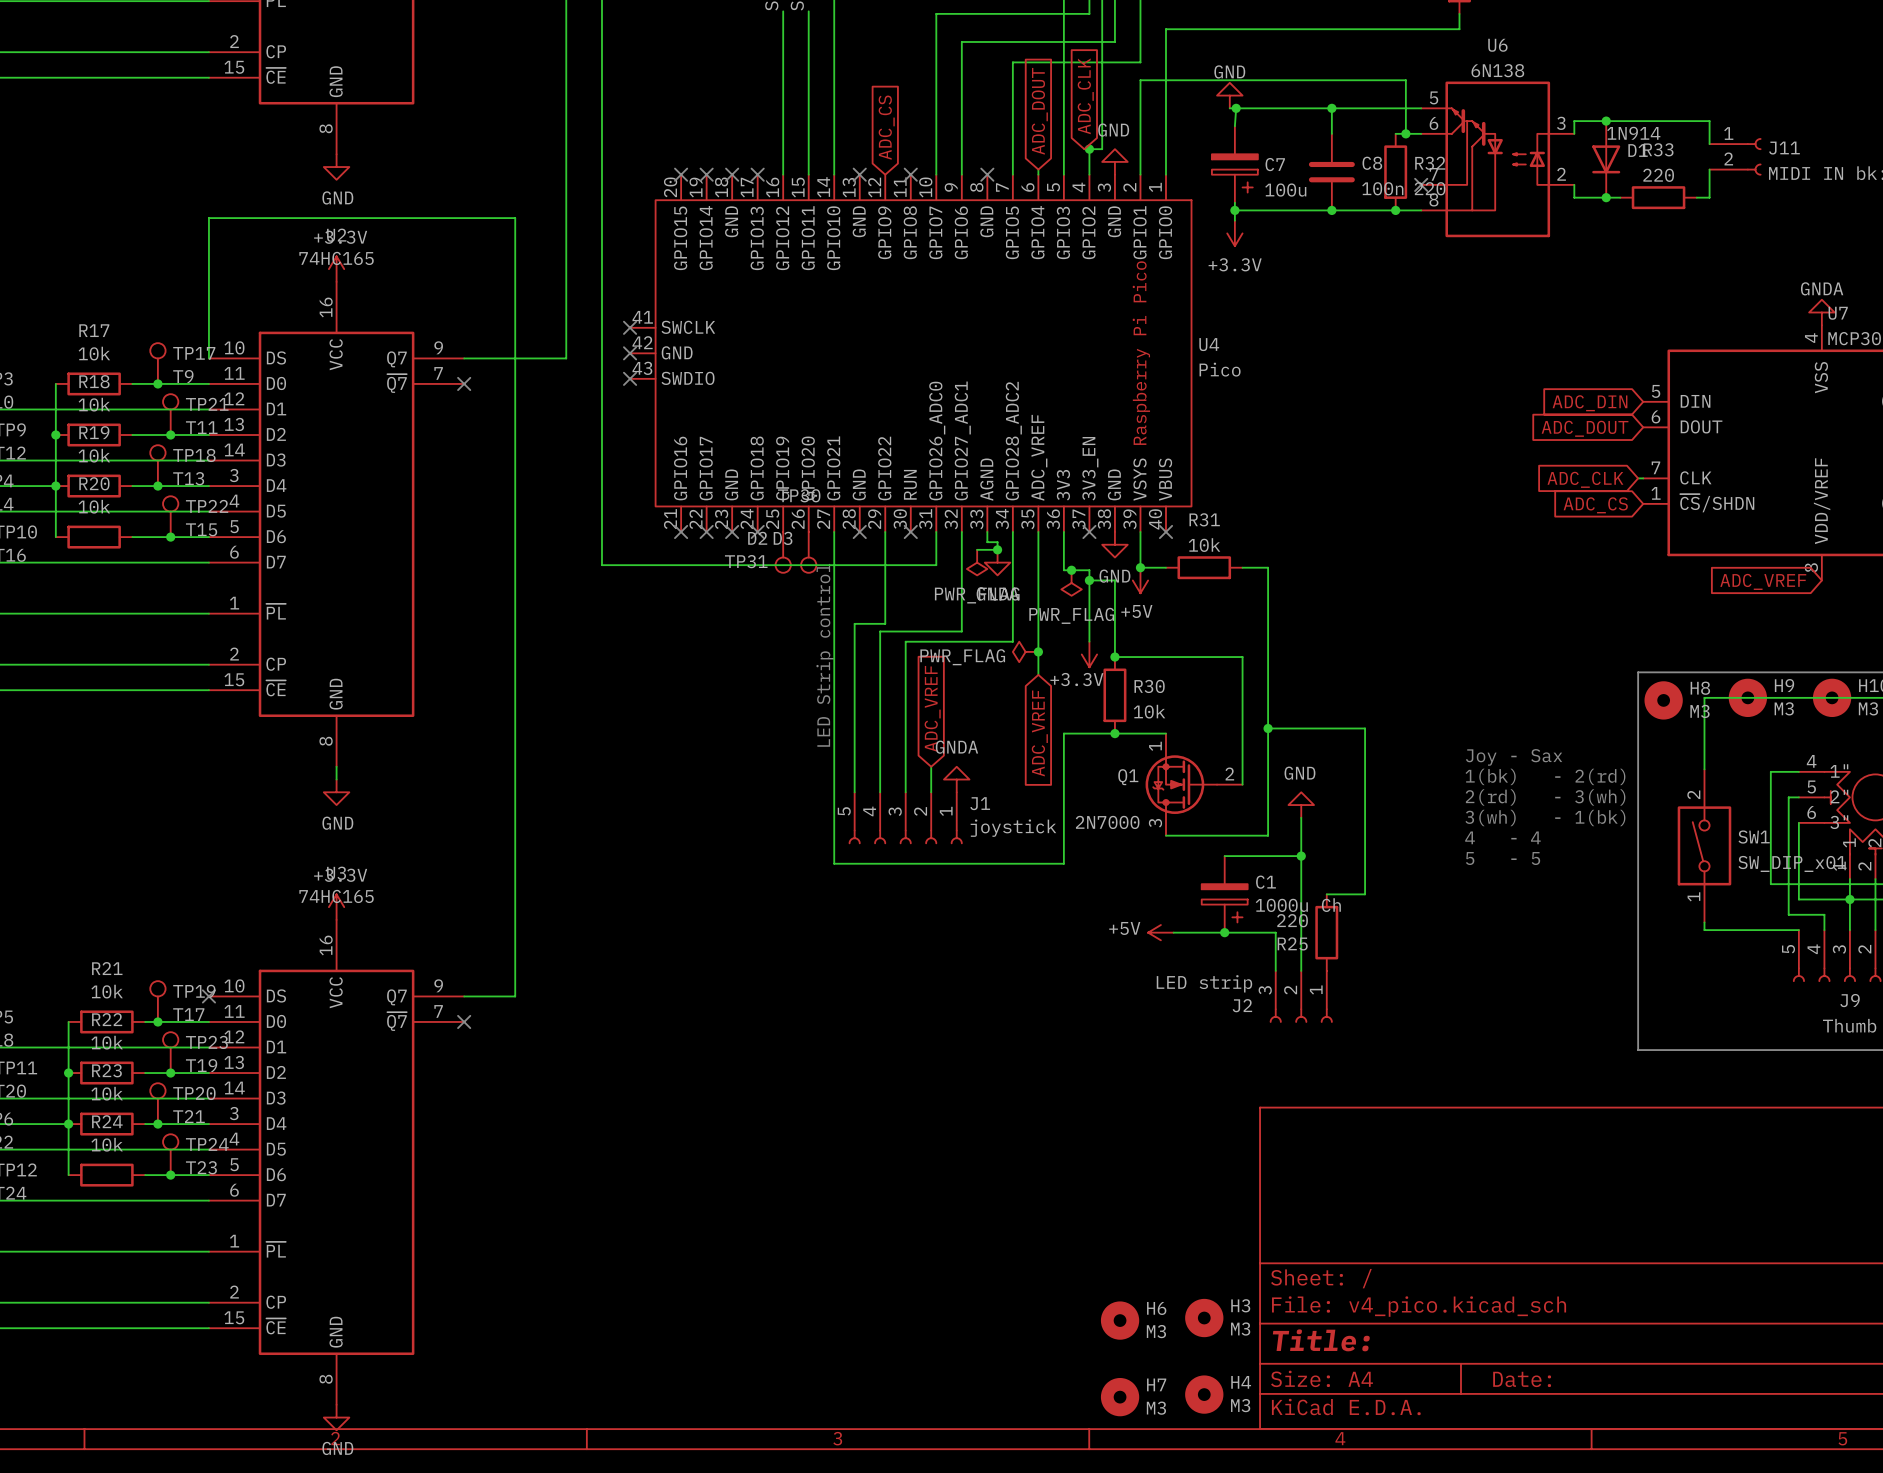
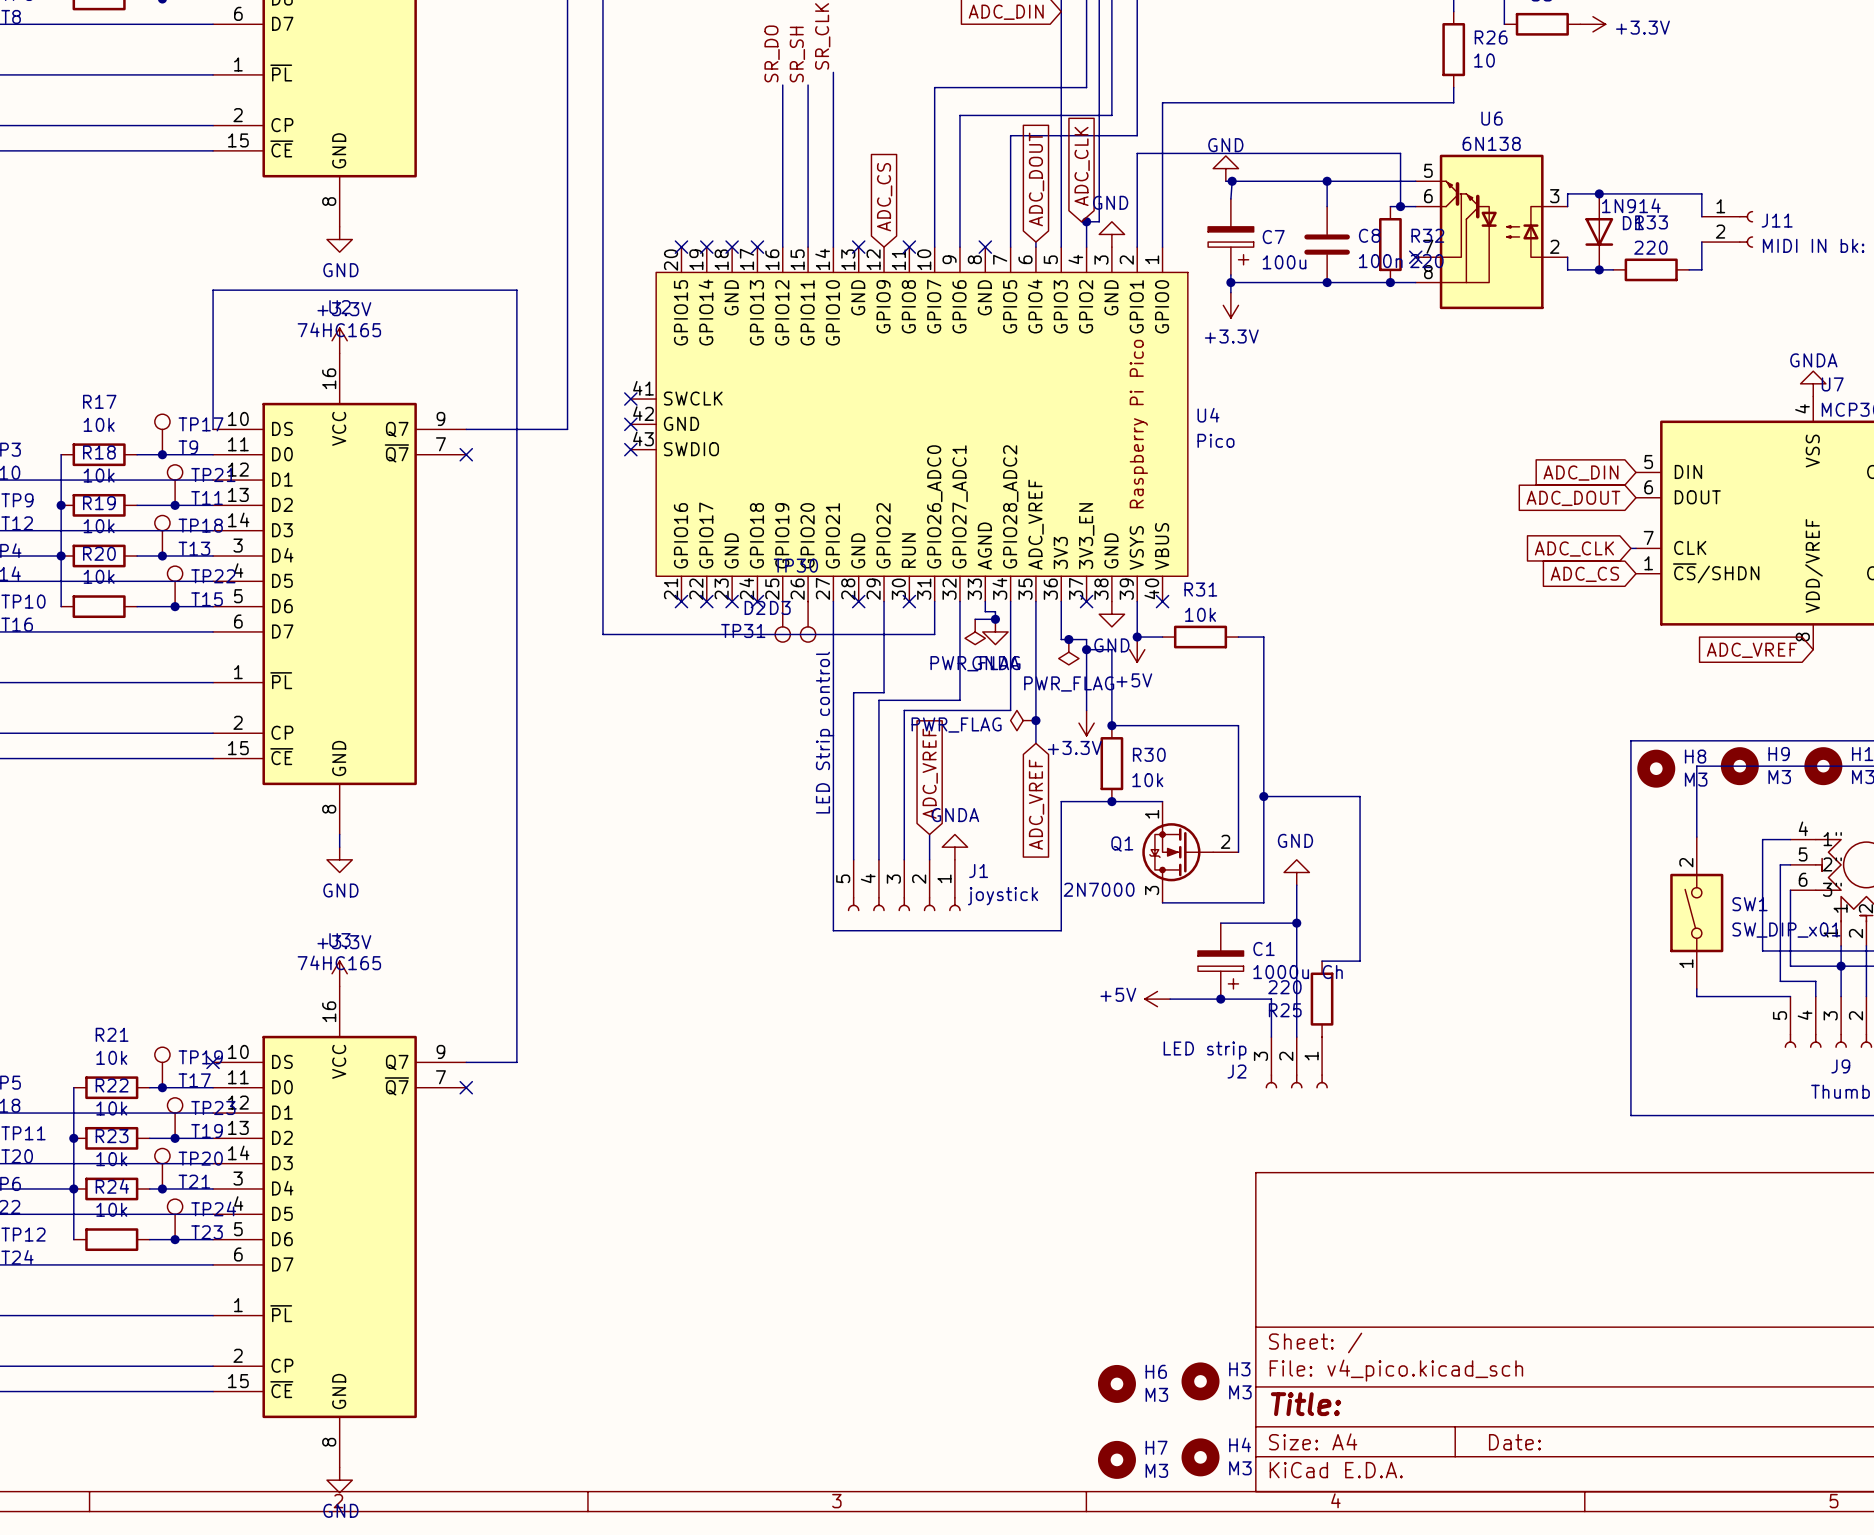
text: Joy - Sax (1514, 757) -> none
text: 1(bk) - 2(rd) (1545, 776) -> none
text: 2(rd) - 3(wh) (1545, 797) -> none
text: 3(wh) - 1(bk) (1545, 818) -> none
text: 4 - 4 (1502, 837) -> none
text: 5 - 5 (1503, 858) -> none

